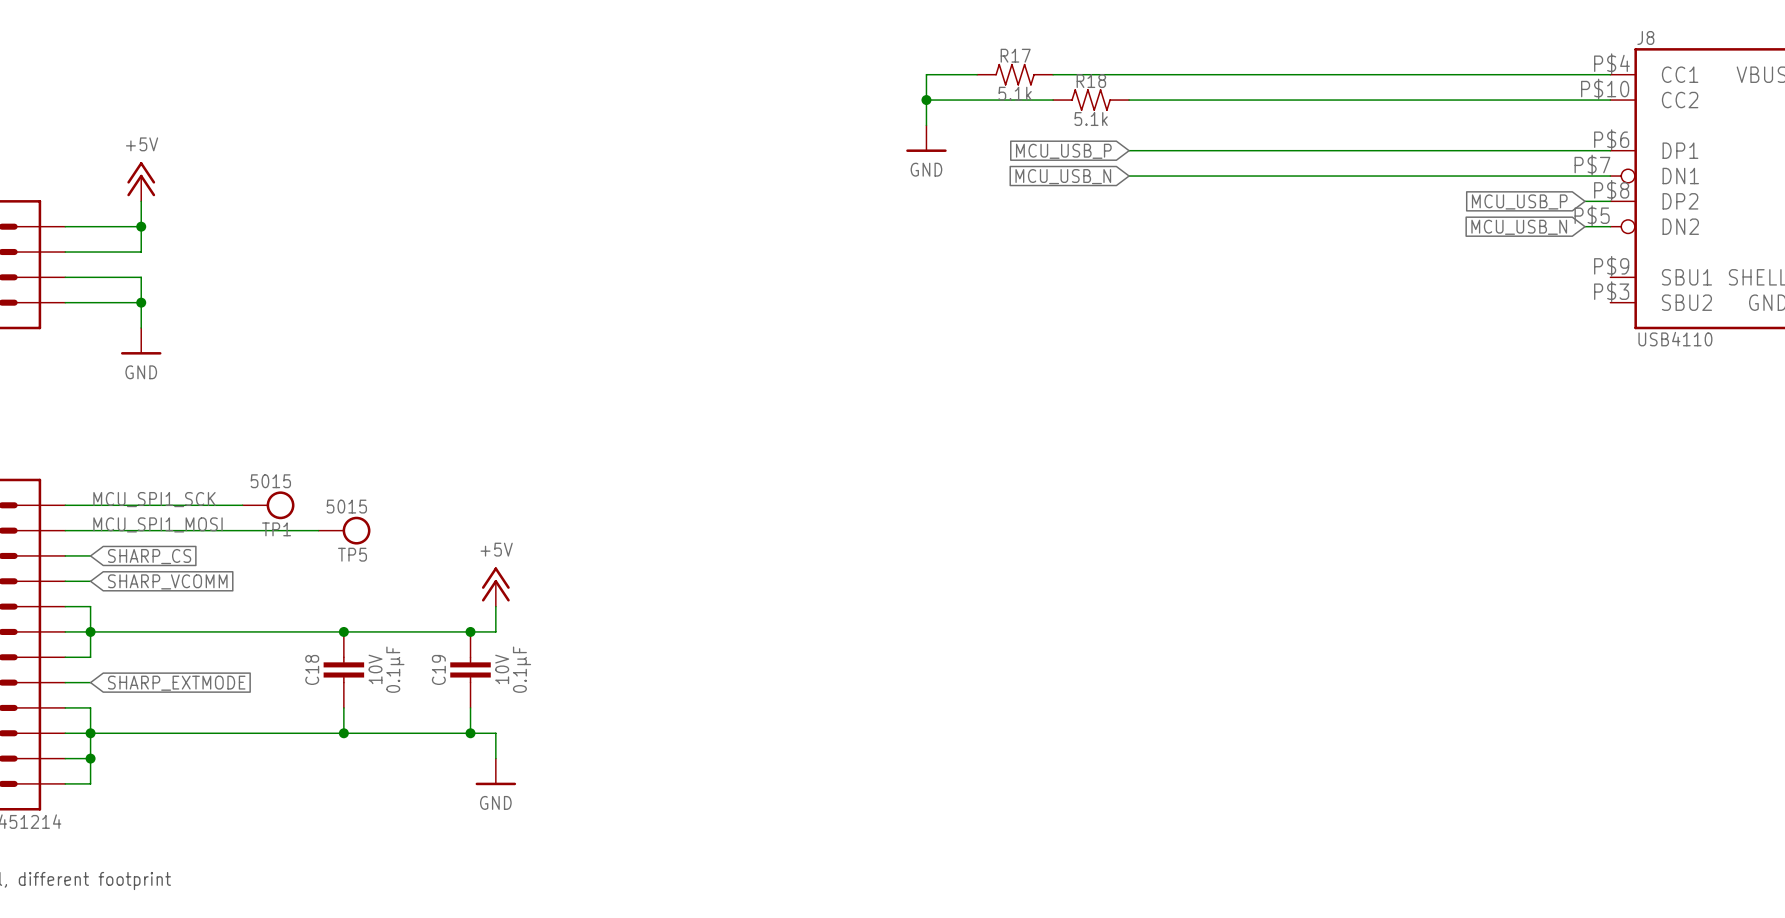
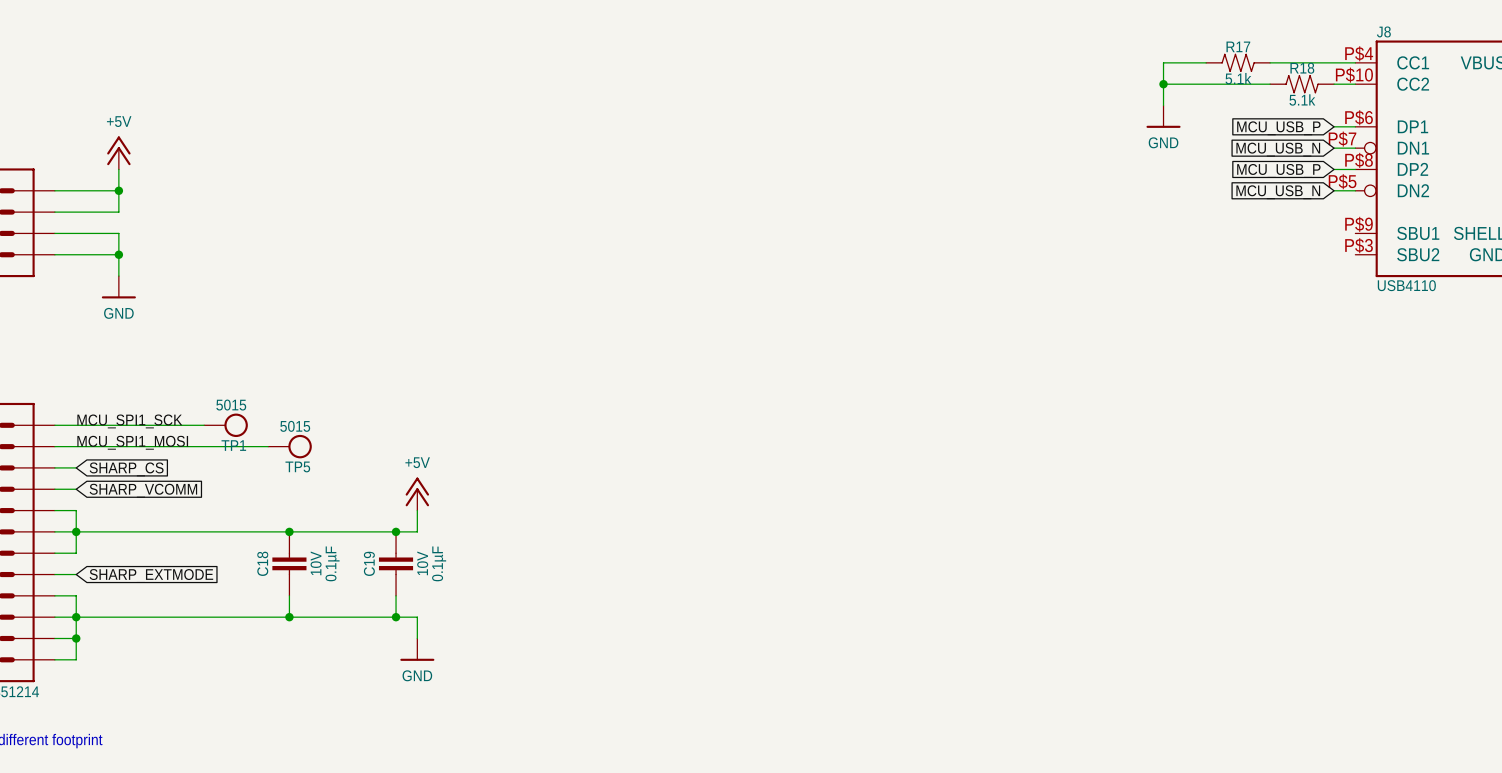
wire: (977, 74) (926, 74) (926, 125) -> none
R17 position: (1015, 74) -> (1238, 62)
wire: (1053, 74) (1382, 74) -> (1163, 105) (1163, 62)
wire: (926, 100) (1053, 100) -> none
junction: (926, 100) -> none
R18 position: (1091, 100) -> (1302, 84)
wire: (1129, 100) (1382, 100) -> none
junction: none -> (1163, 84)
power symbol: GND (926, 138) -> none
power symbol: none -> GND (1163, 116)
wire: (1129, 150) (1585, 150) -> none
global label: MCU_USB_P (1063, 151) -> none
global label: none -> MCU_USB_P (1278, 128)
global label: MCU_USB_N (1063, 176) -> none
wire: (1129, 176) (1585, 176) -> none
global label: none -> MCU_USB_N (1278, 149)

